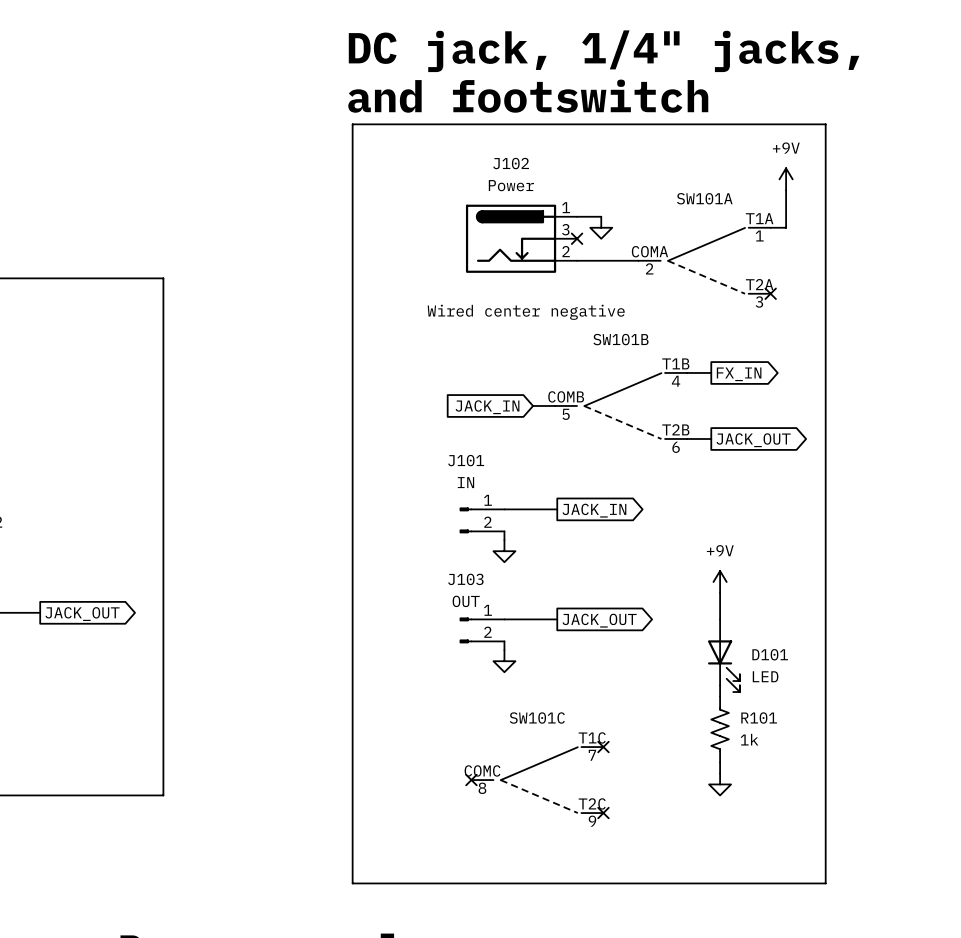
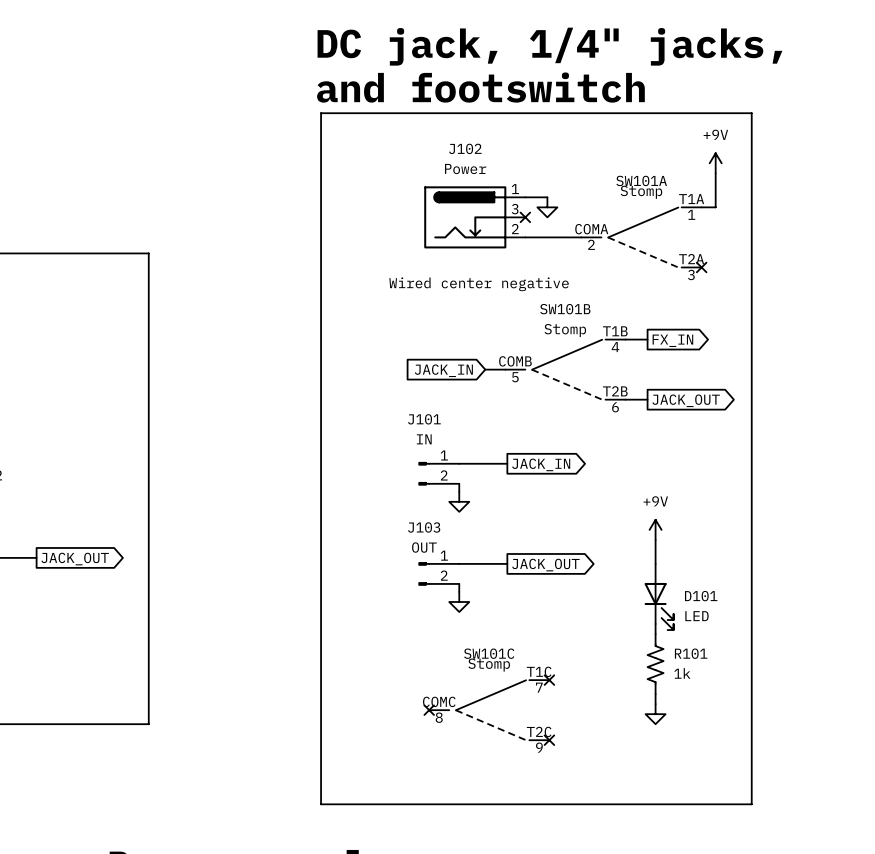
SW101A value: none -> Stomp (641, 192)
SW101B value: none -> Stomp (565, 330)
SW101C value: none -> Stomp (489, 665)

